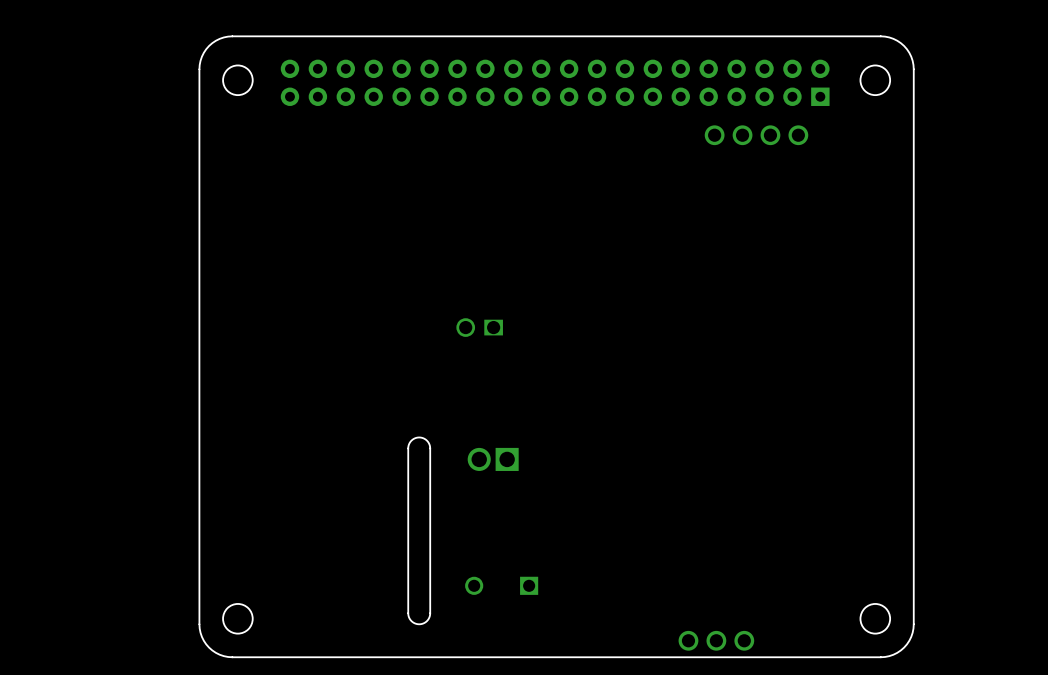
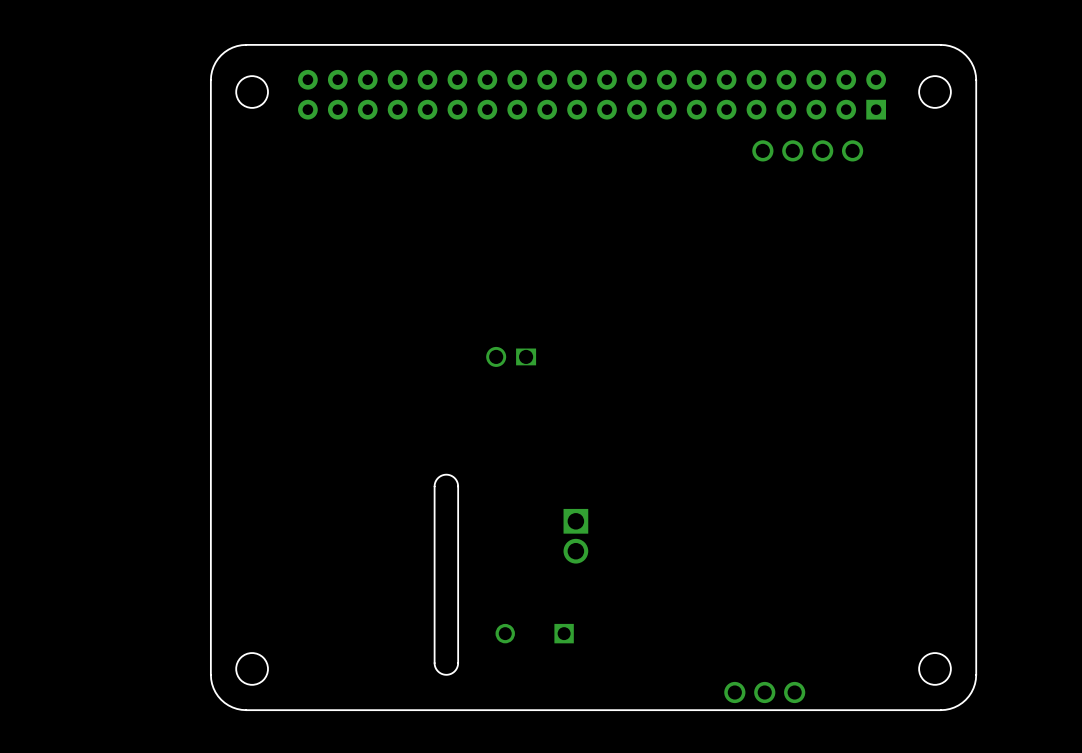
part rotation: 0° (493, 459) -> 90° counterclockwise (575, 536)
part position: (493, 459) -> (575, 536)

